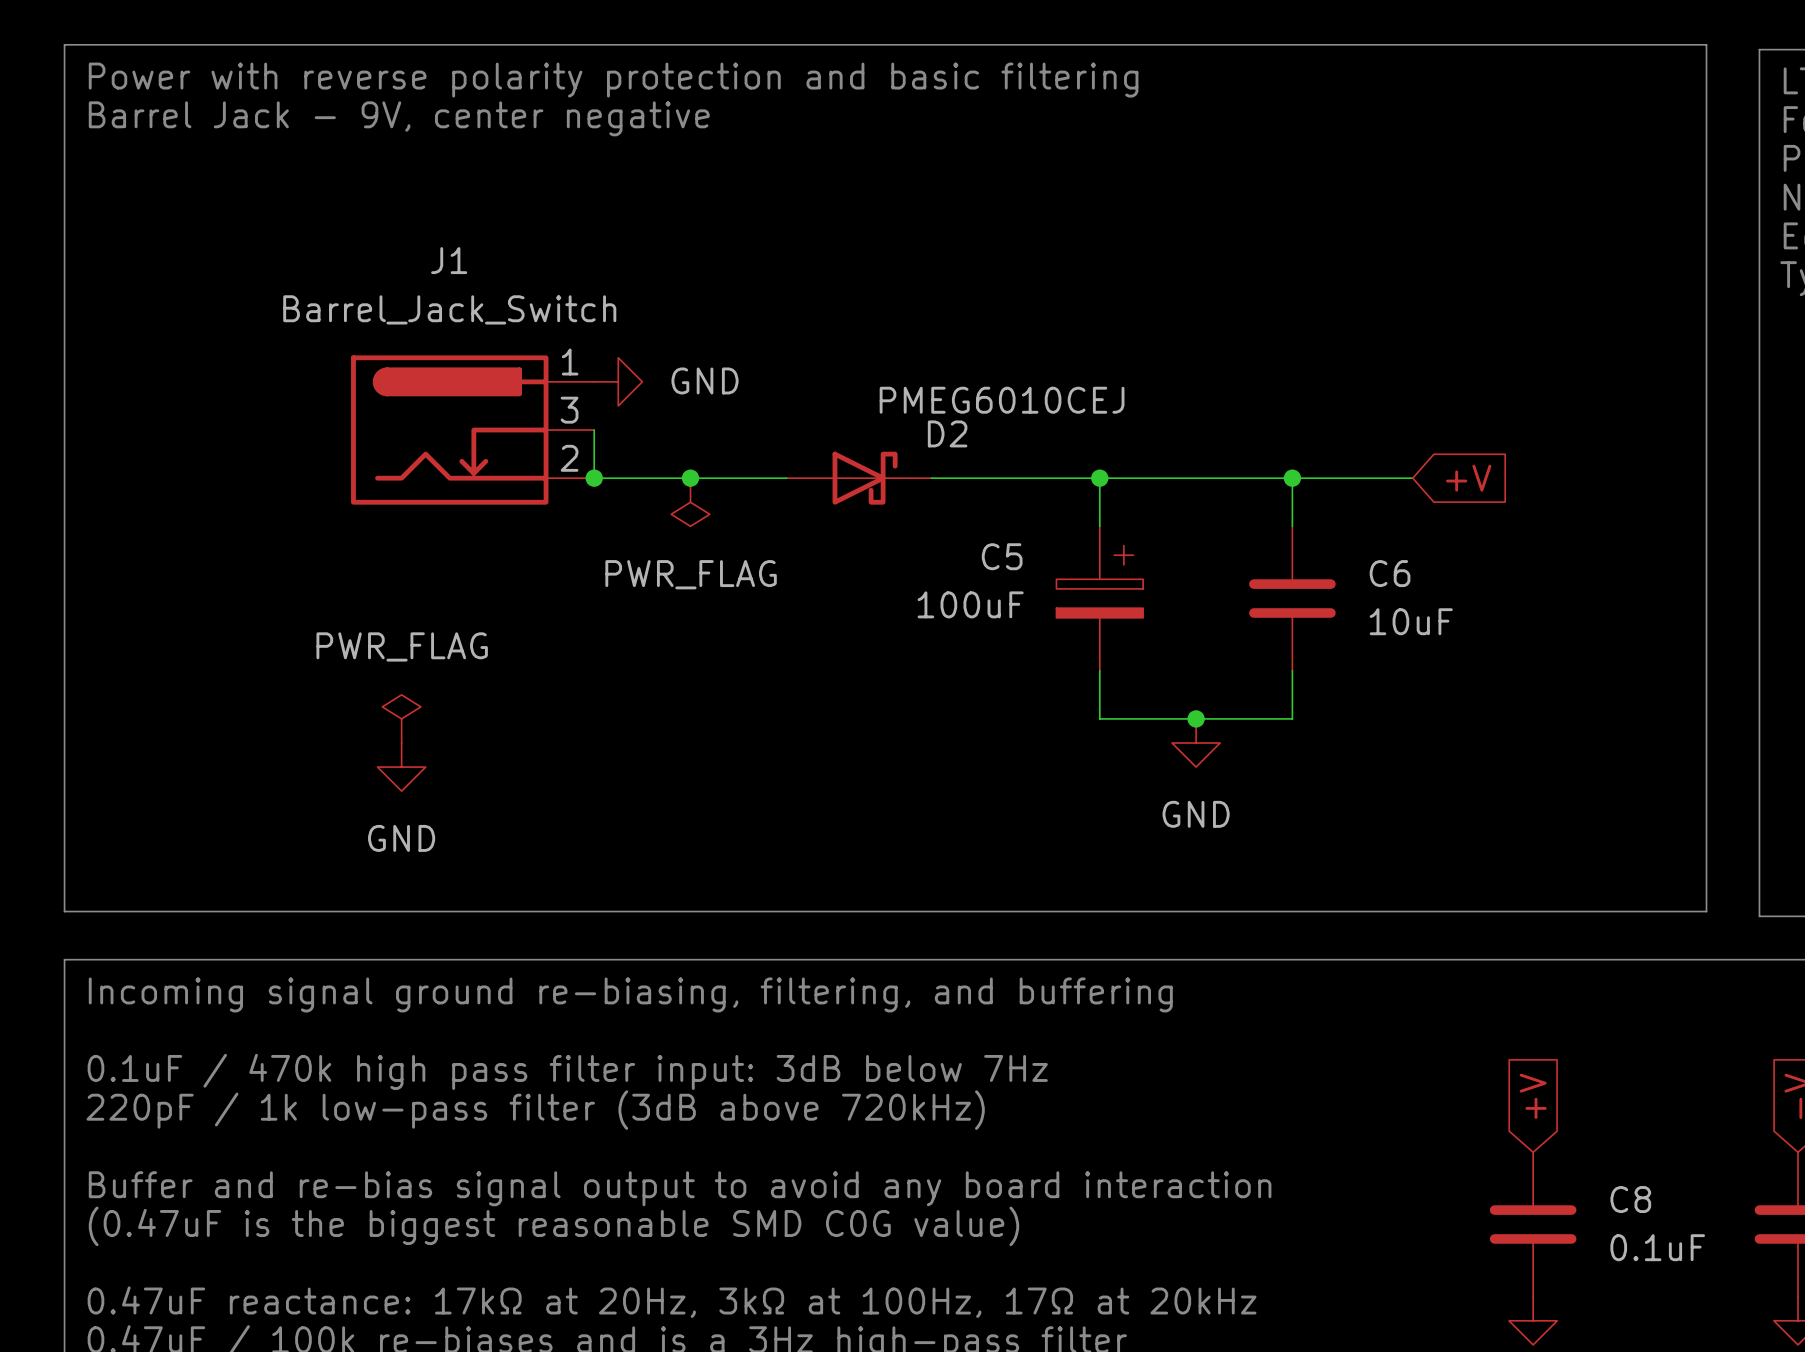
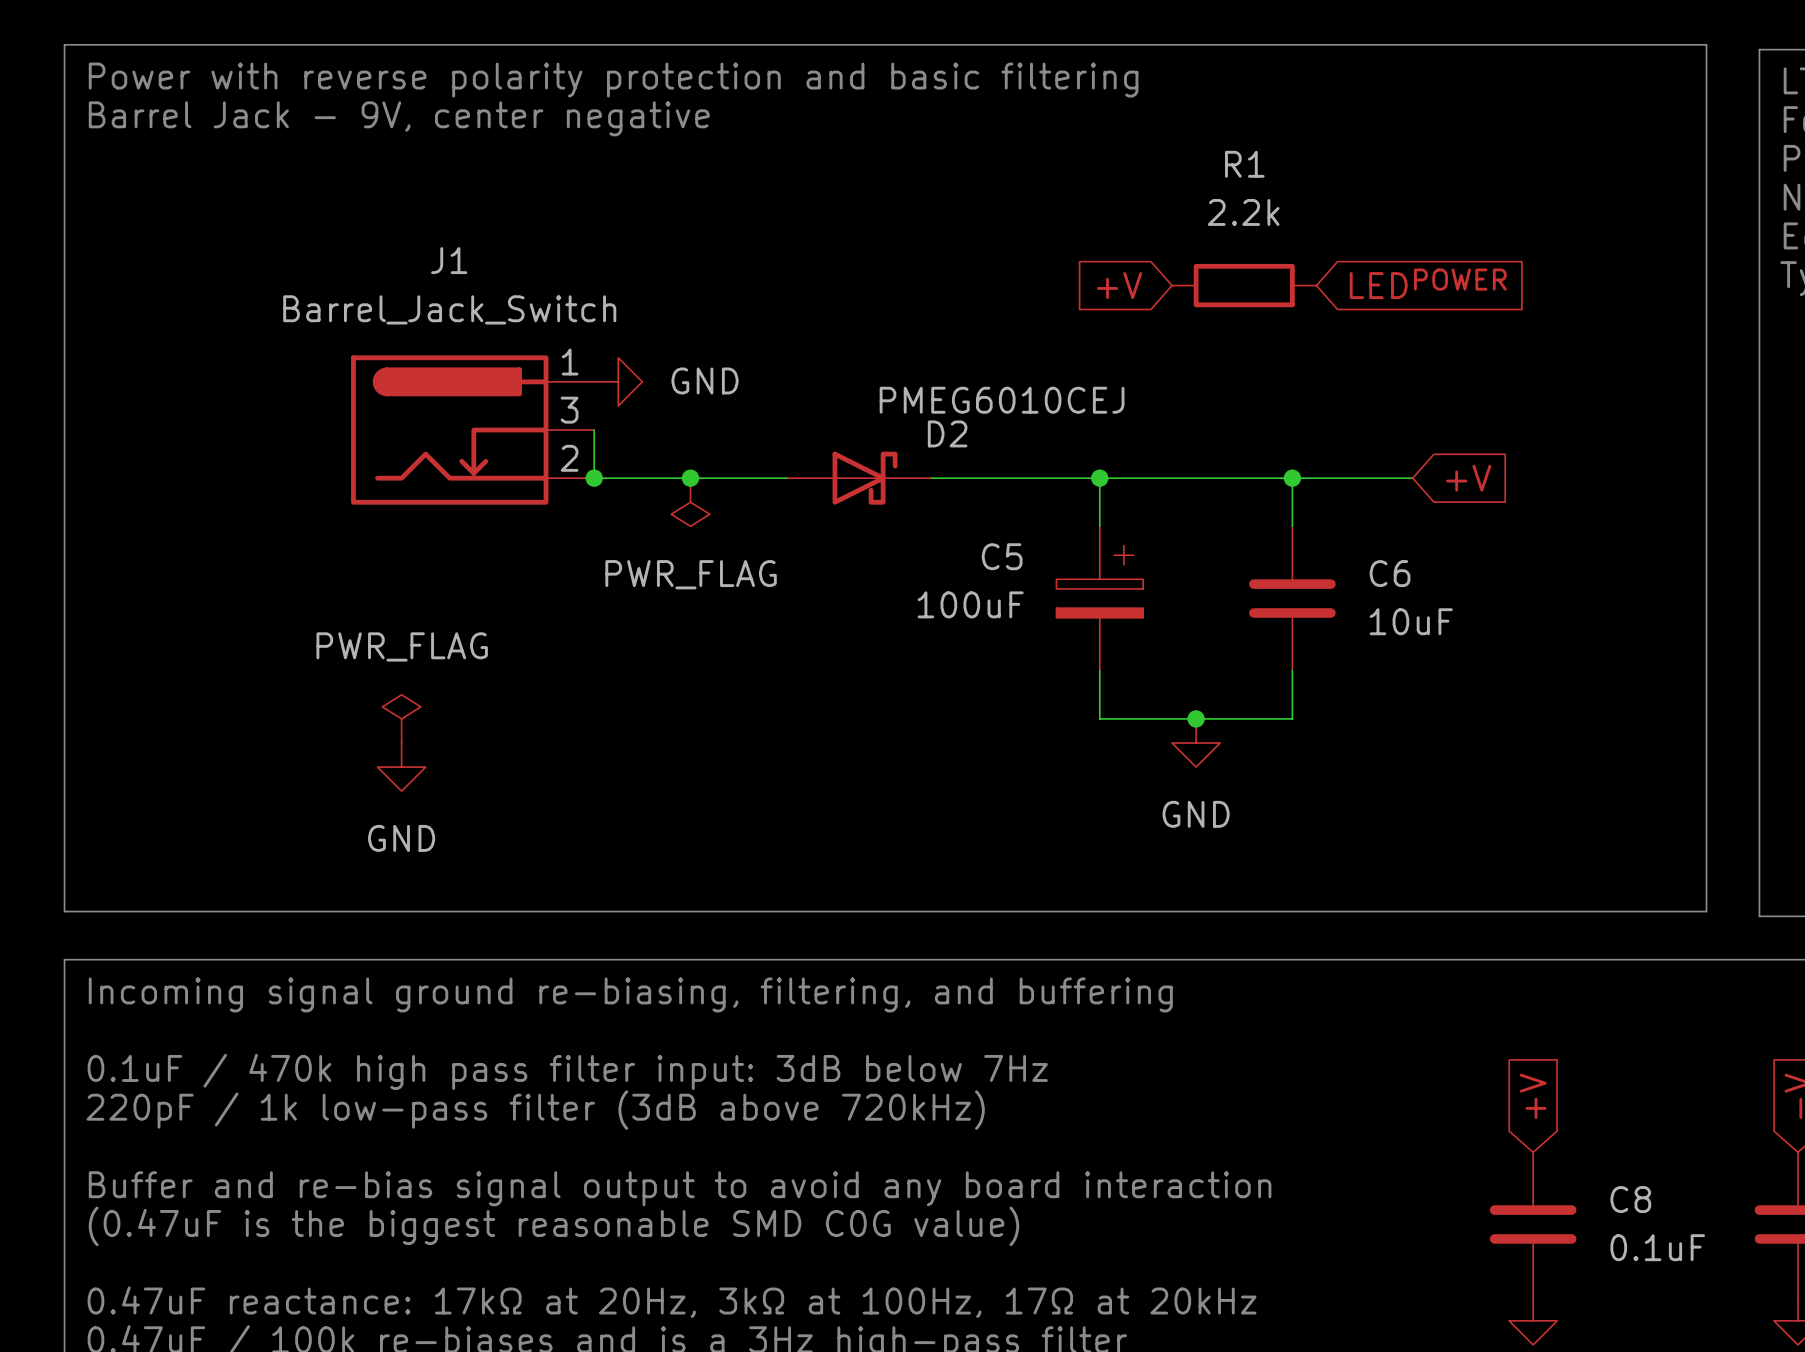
global label: none -> LEDPOWER (1428, 283)
global label: none -> +V (1119, 285)
R1: none -> 2.2k (1244, 285)

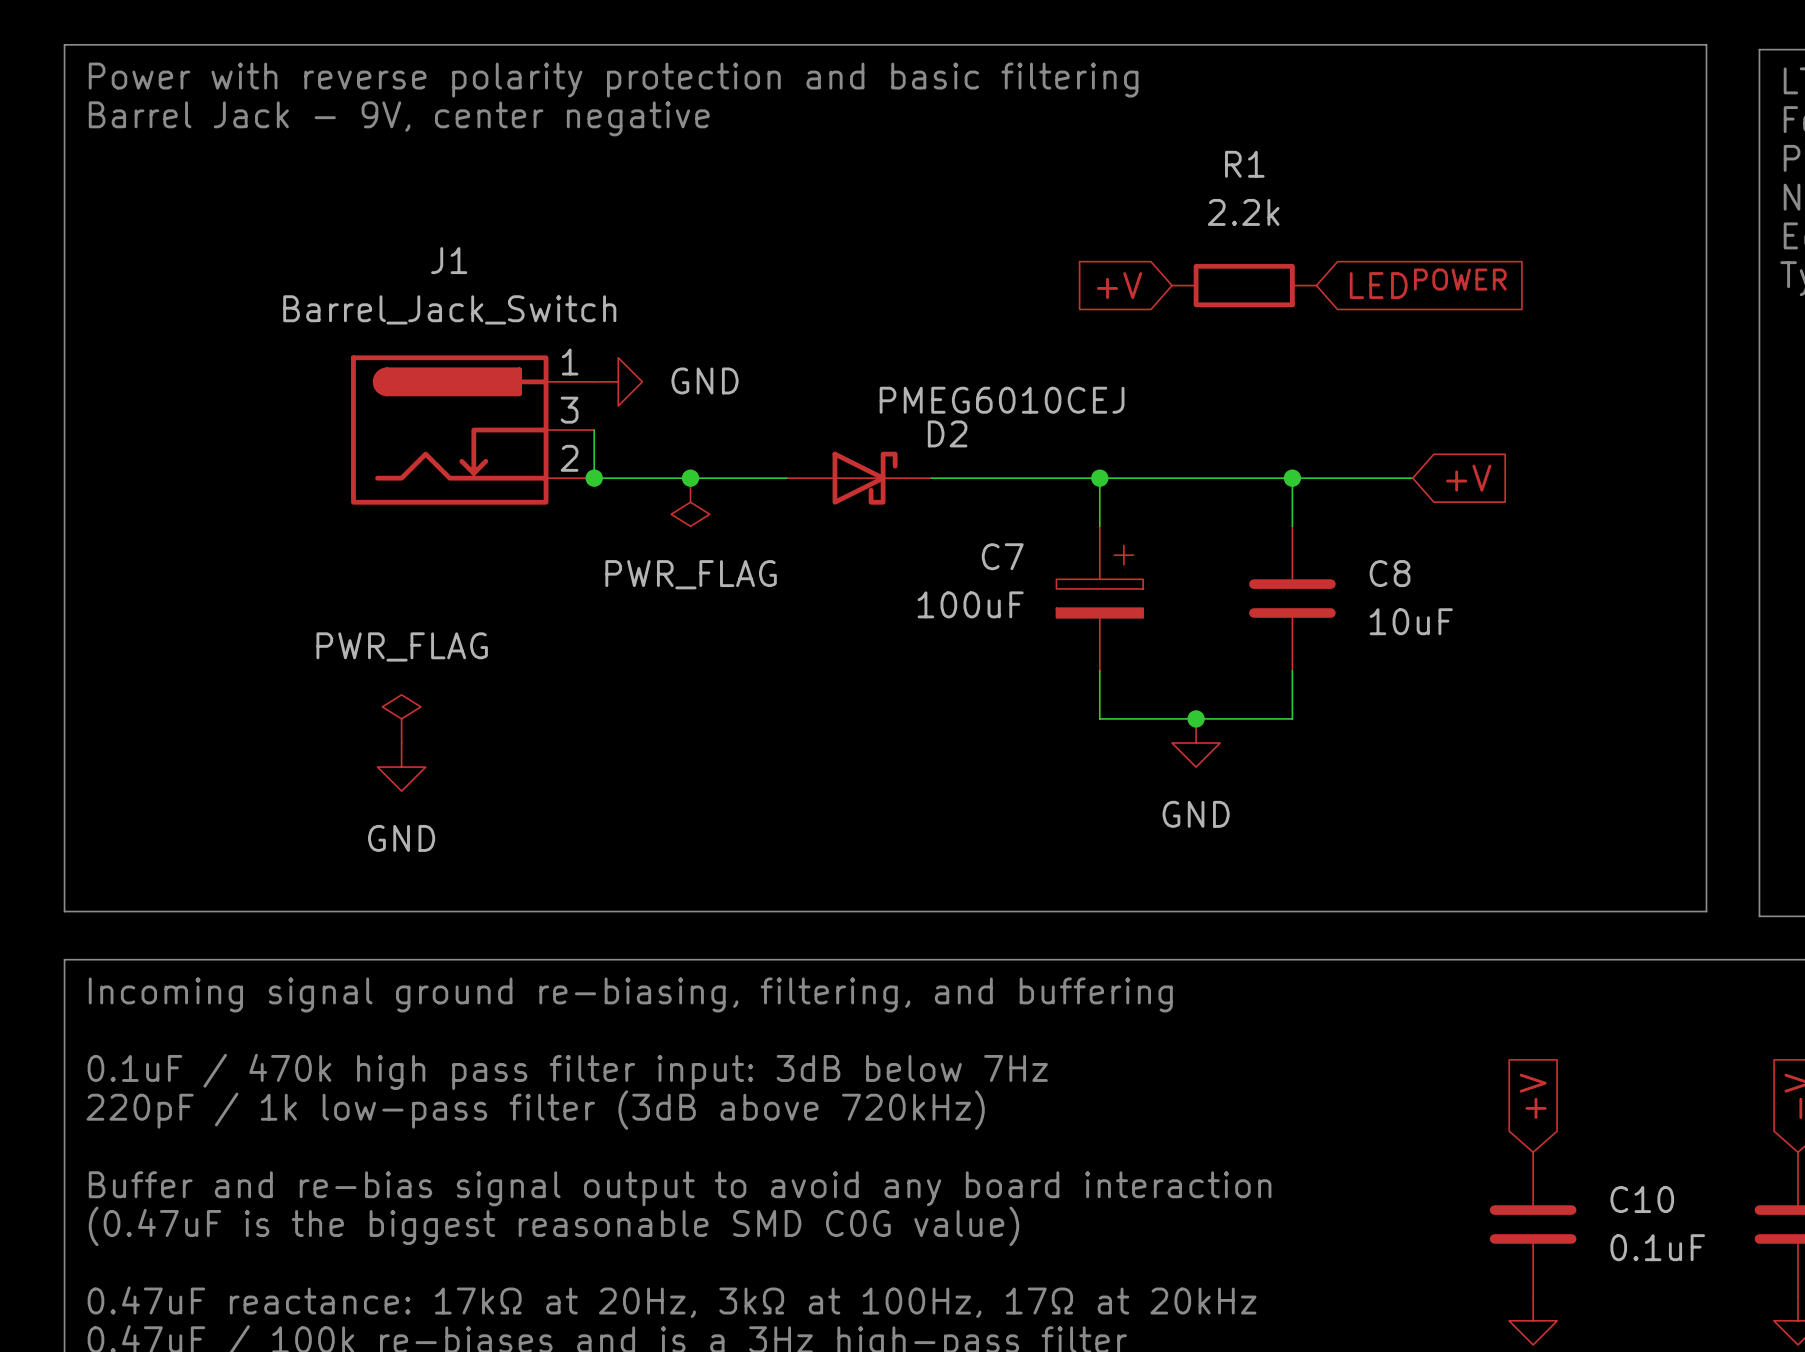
C5 name: C5 (1002, 556) -> C7 (1002, 556)
C6 name: C6 (1390, 573) -> C8 (1390, 573)
C8 name: C8 (1630, 1199) -> C10 (1642, 1199)

